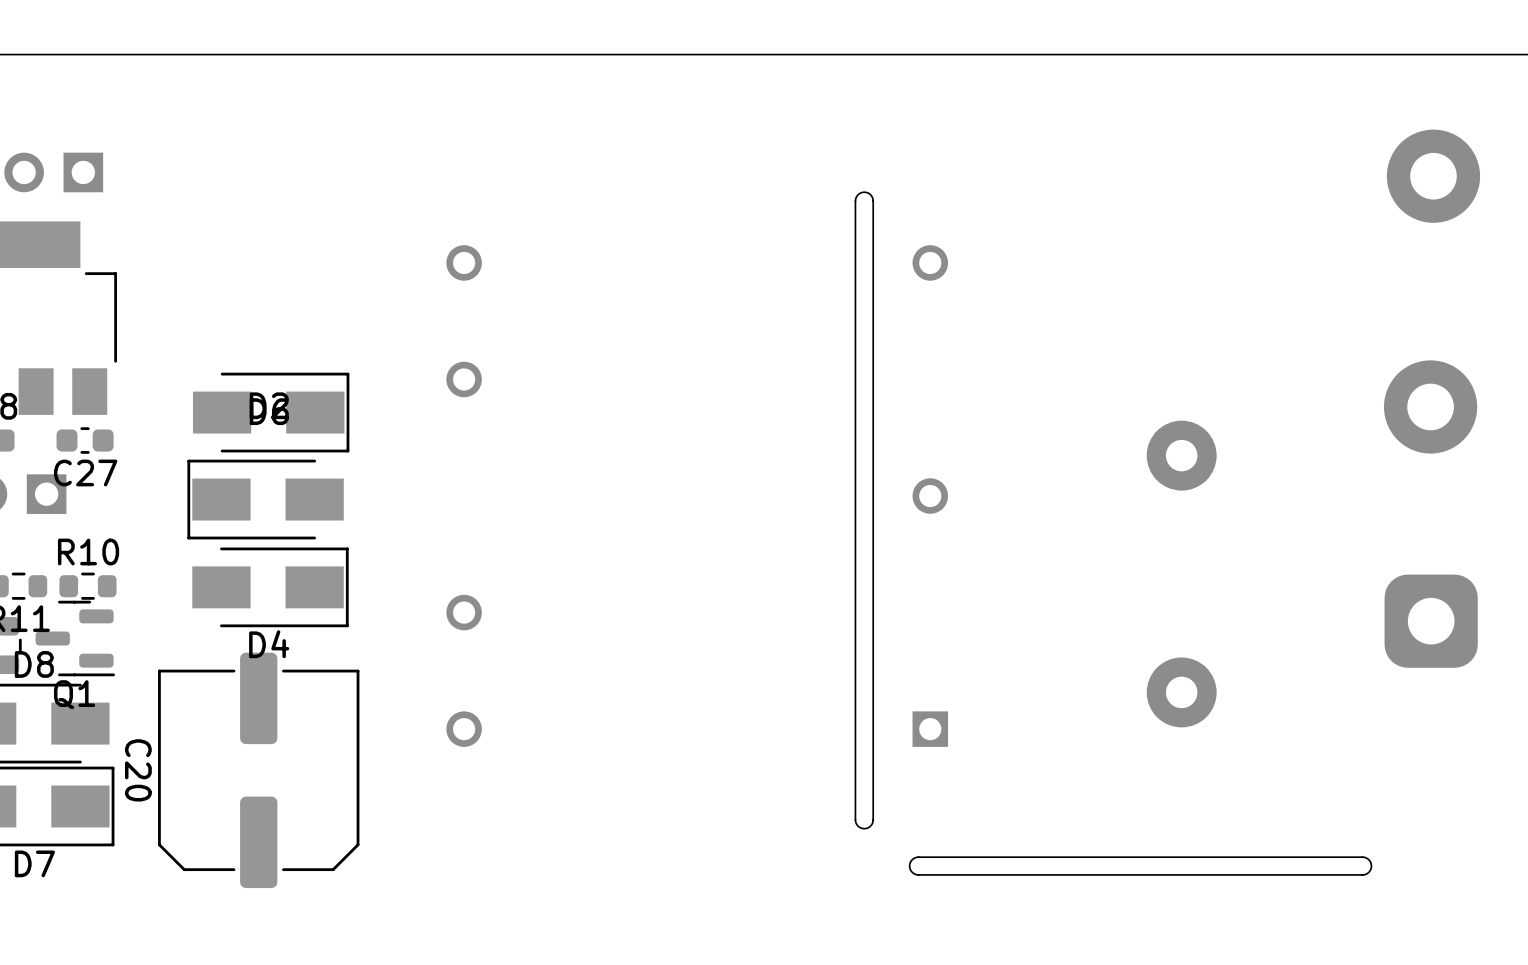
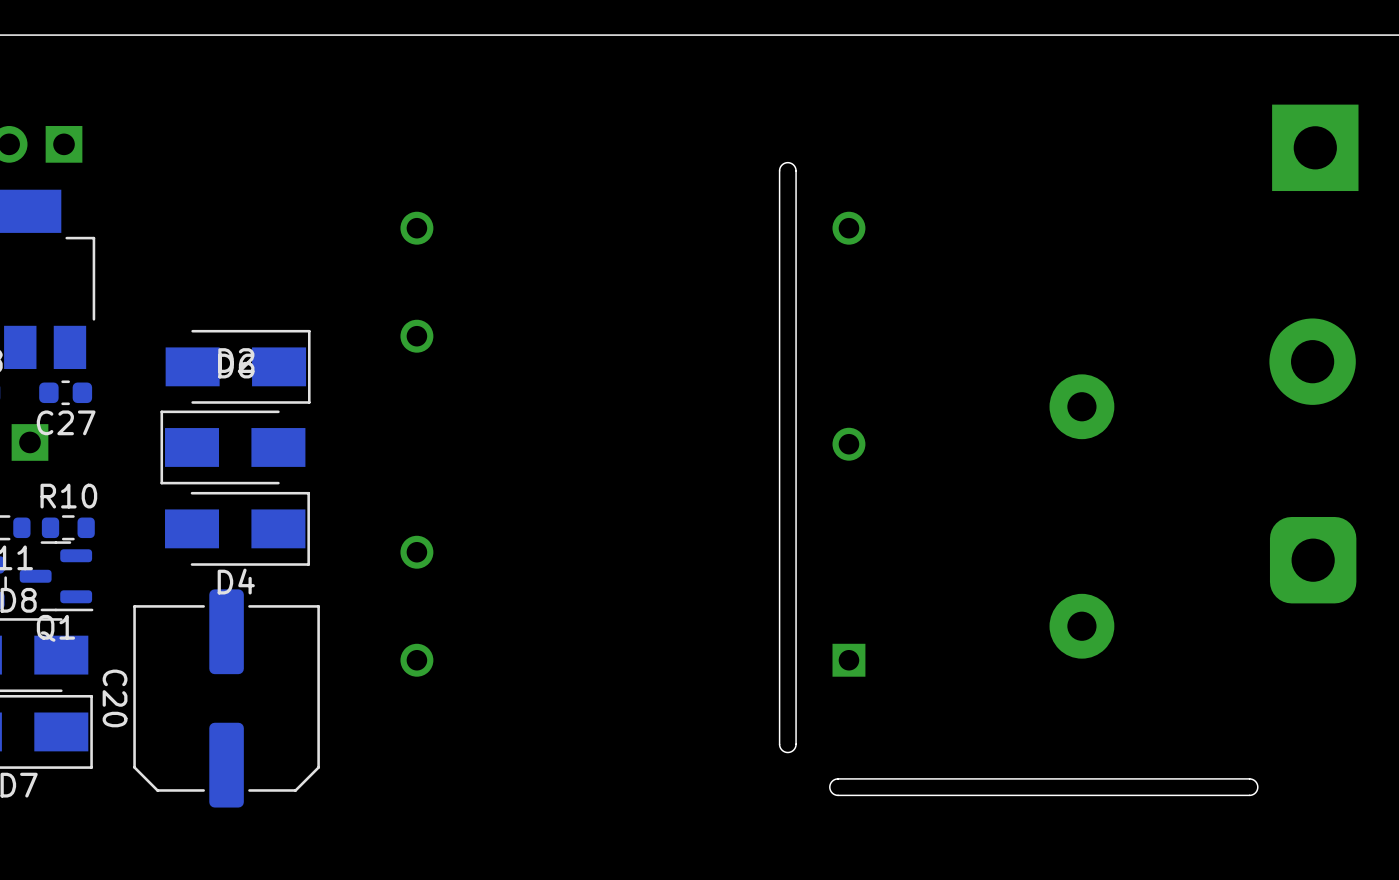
part footprint: [1386, 129, 1481, 223] -> [1272, 104, 1359, 192]

